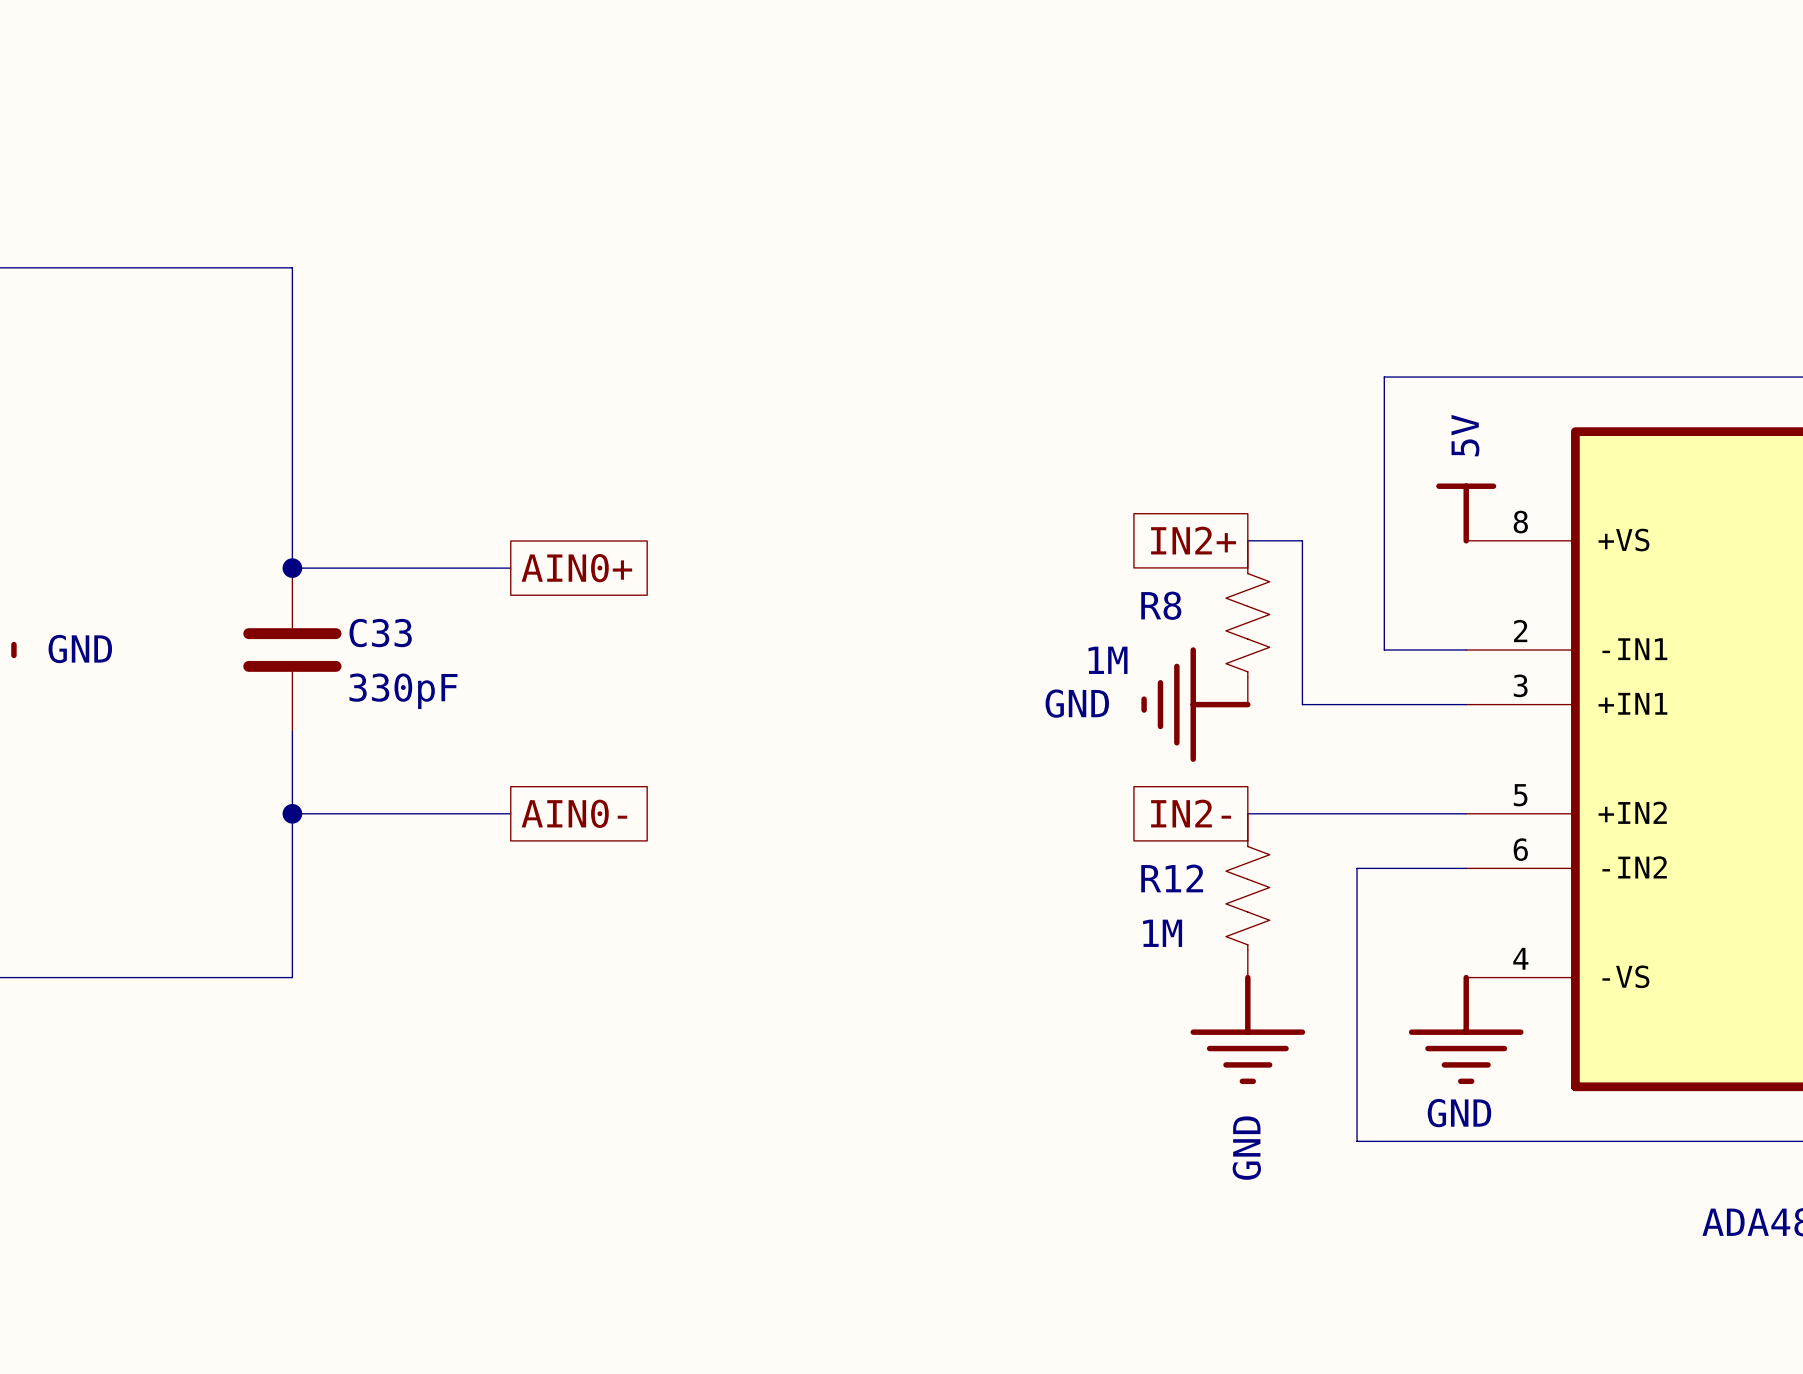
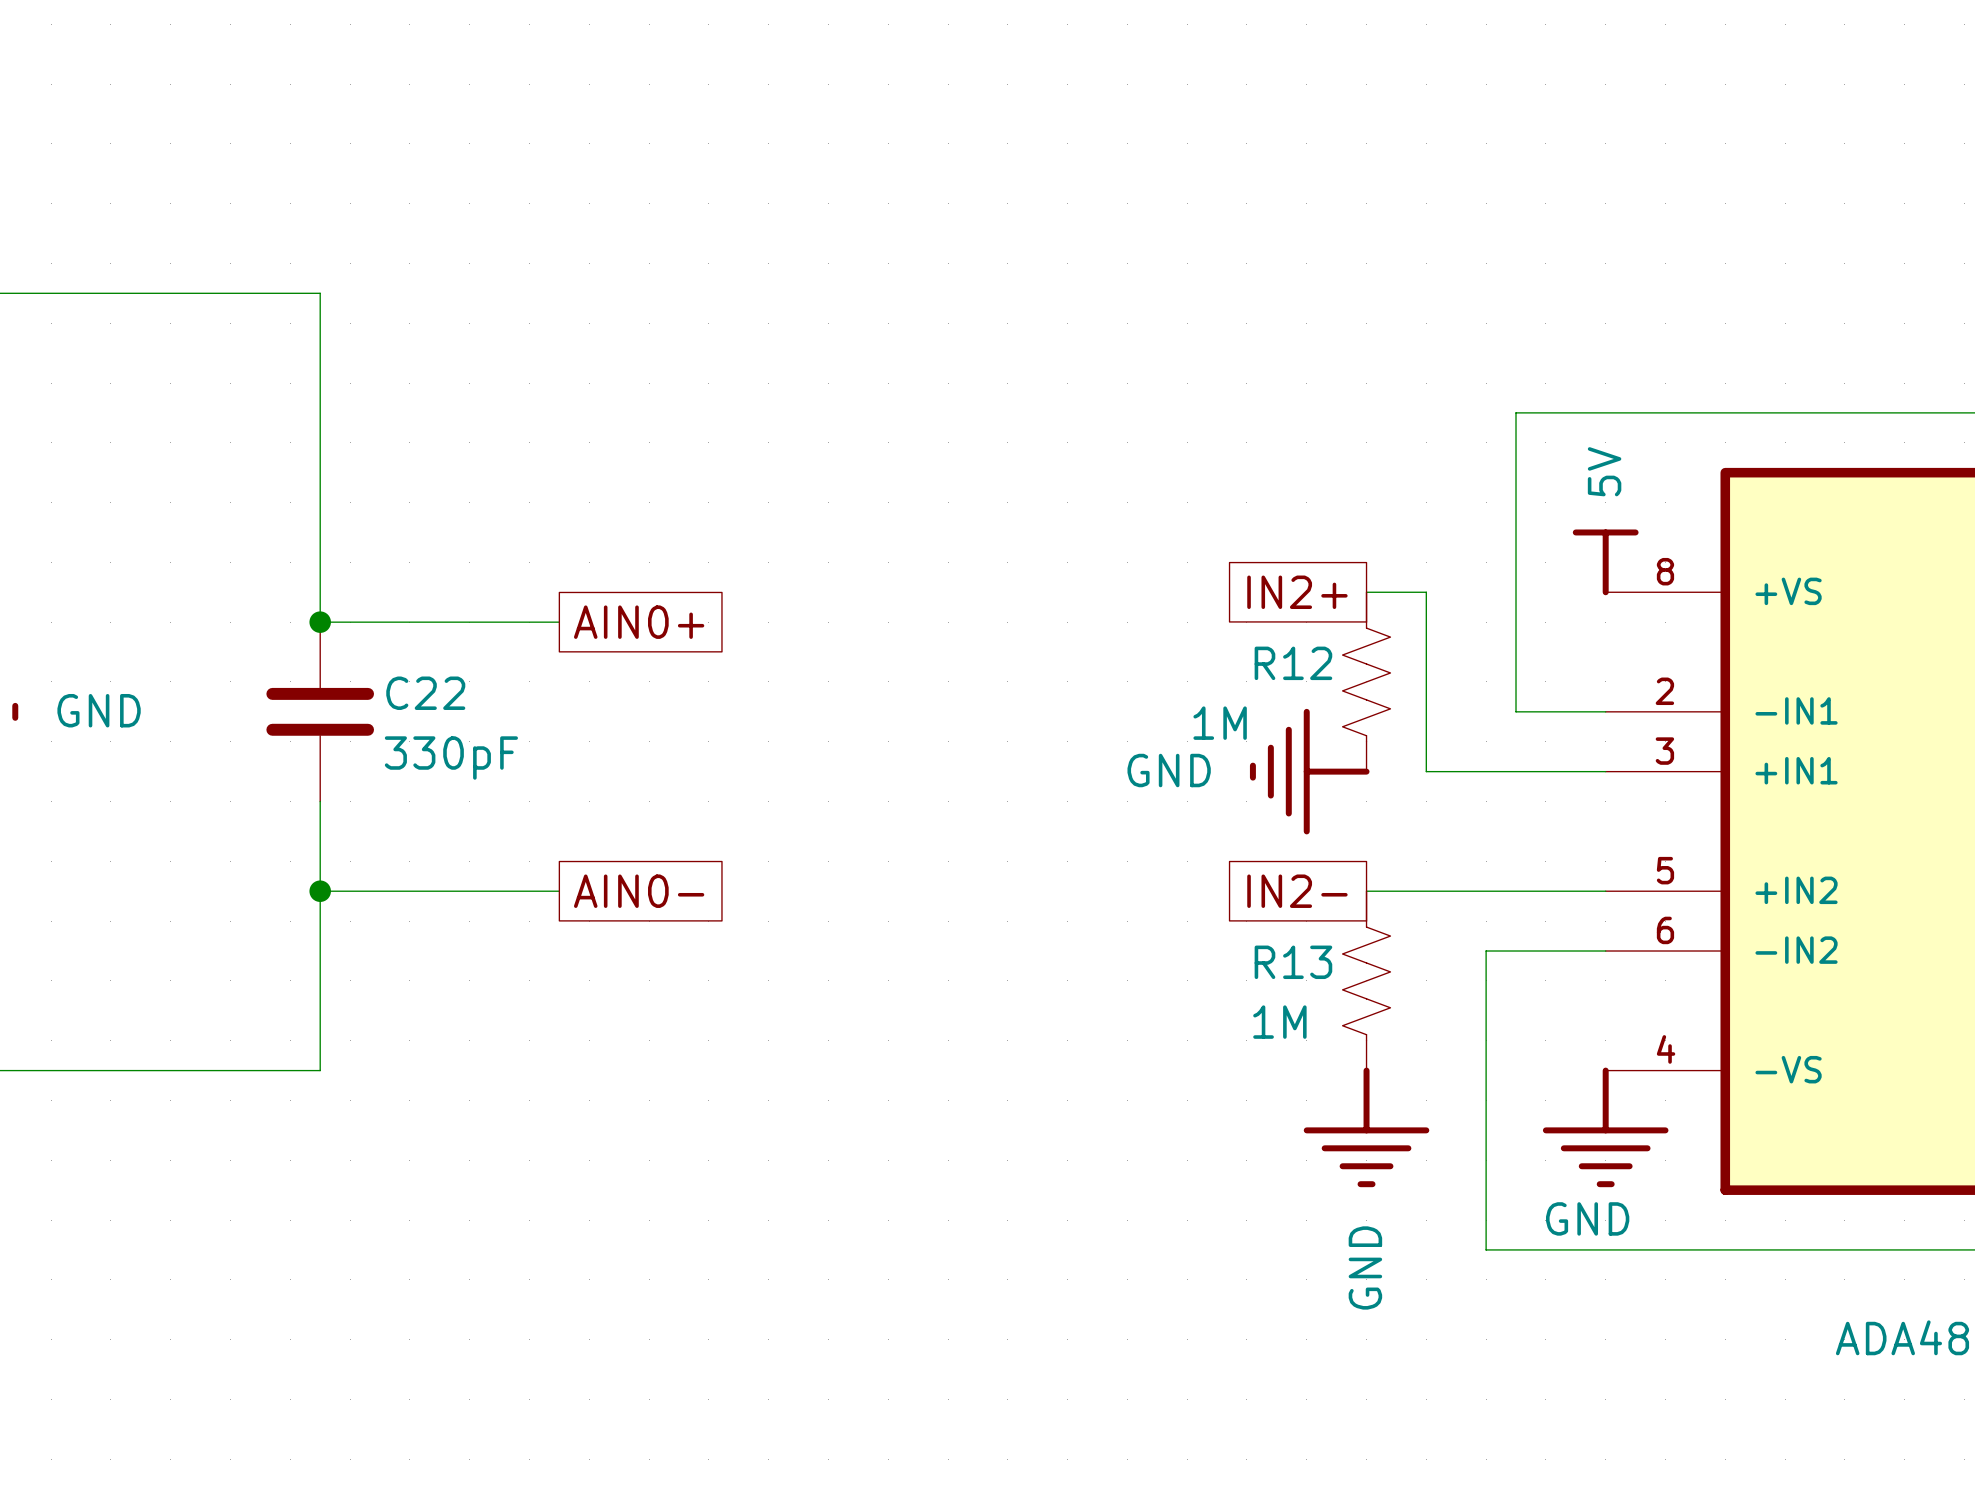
R8 name: R8 (1161, 605) -> R12 (1293, 663)
C33 name: C33 (380, 633) -> C22 (425, 693)
R12 name: R12 (1172, 878) -> R13 (1293, 962)

